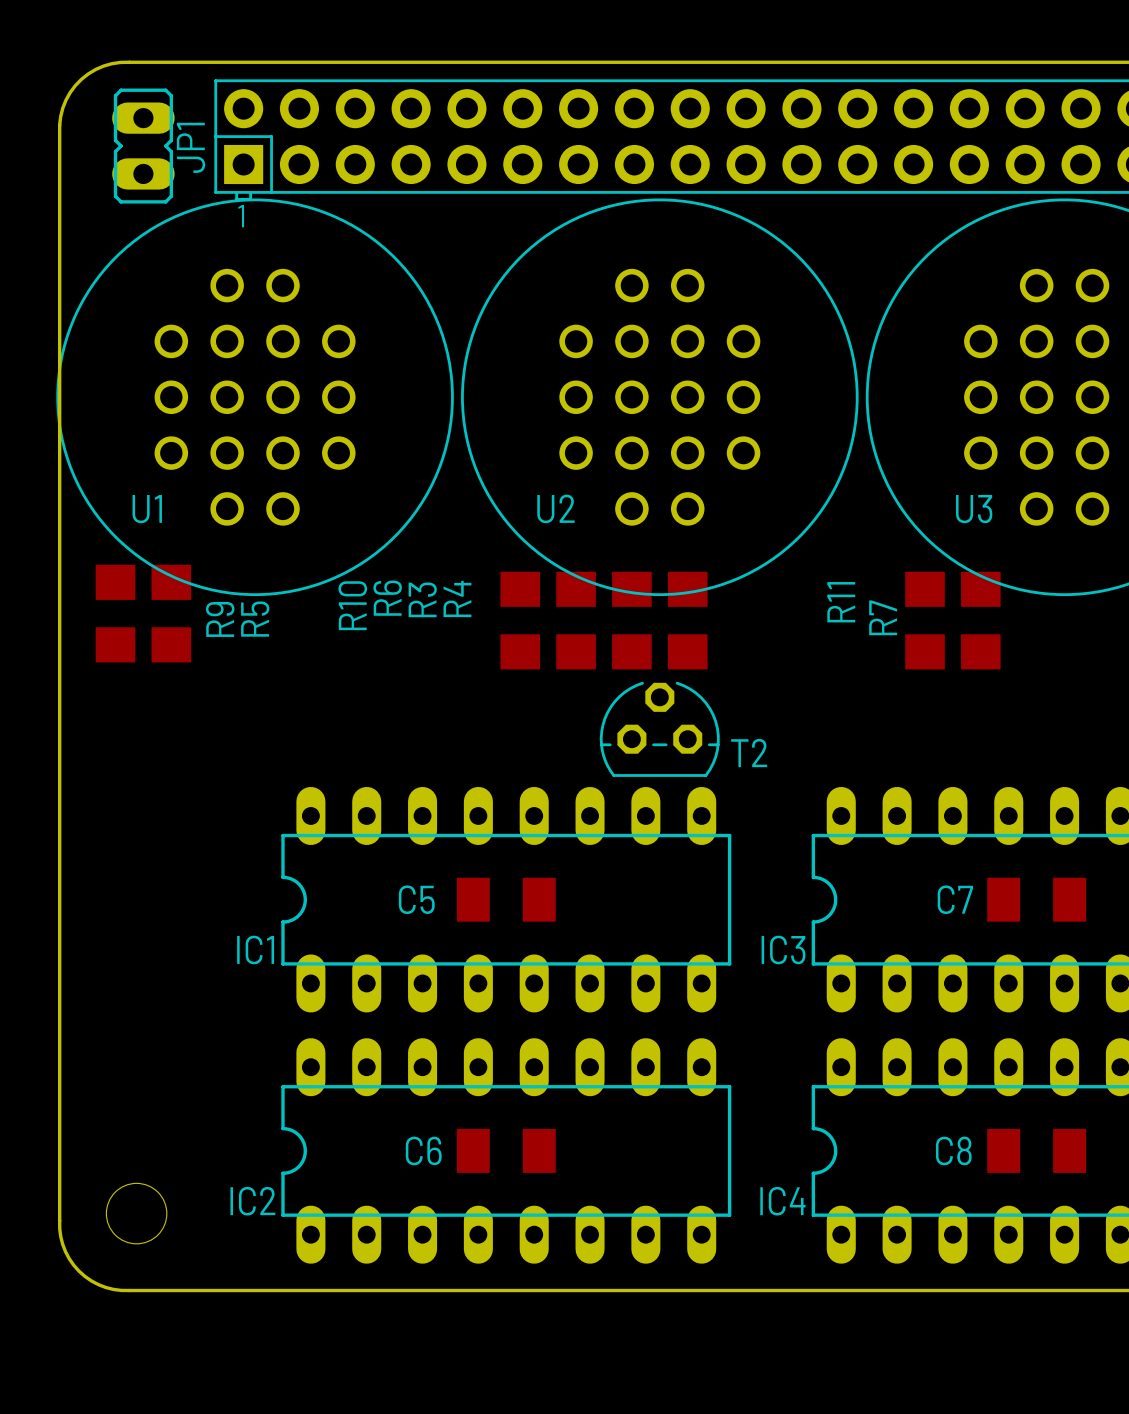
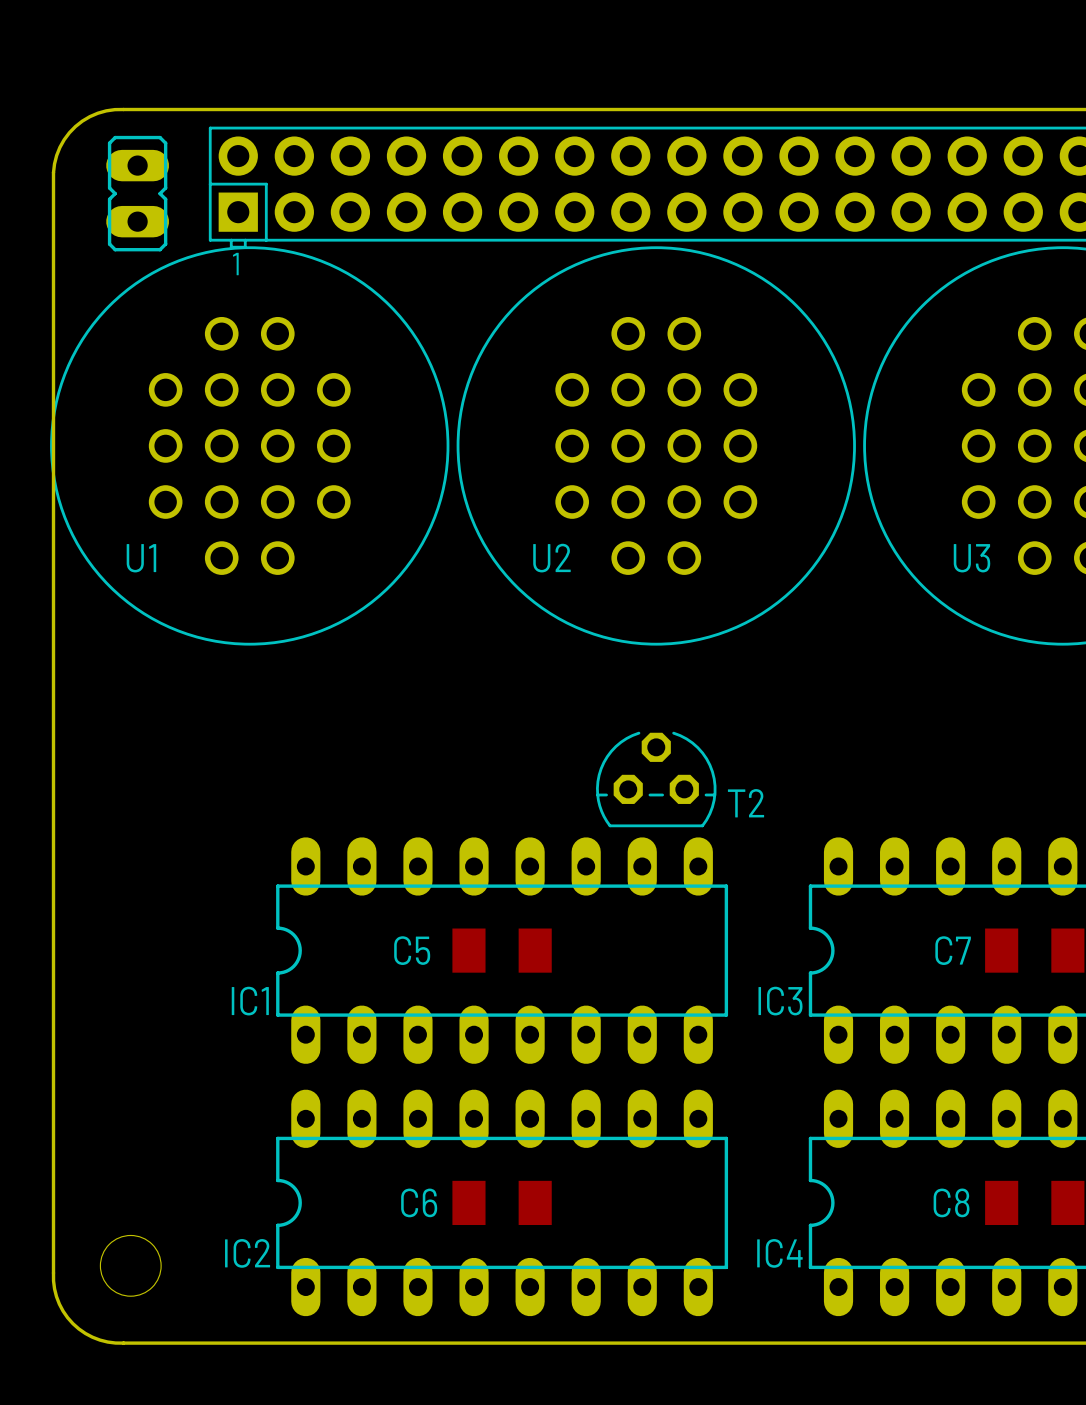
JP1 name: JP1 (191, 147) -> none
R9: (115, 613) -> none
R5: (171, 613) -> none
R10: (520, 620) -> none
R6: (576, 620) -> none
R3: (631, 620) -> none
R4: (687, 620) -> none
R11: (925, 620) -> none
R7: (980, 620) -> none

